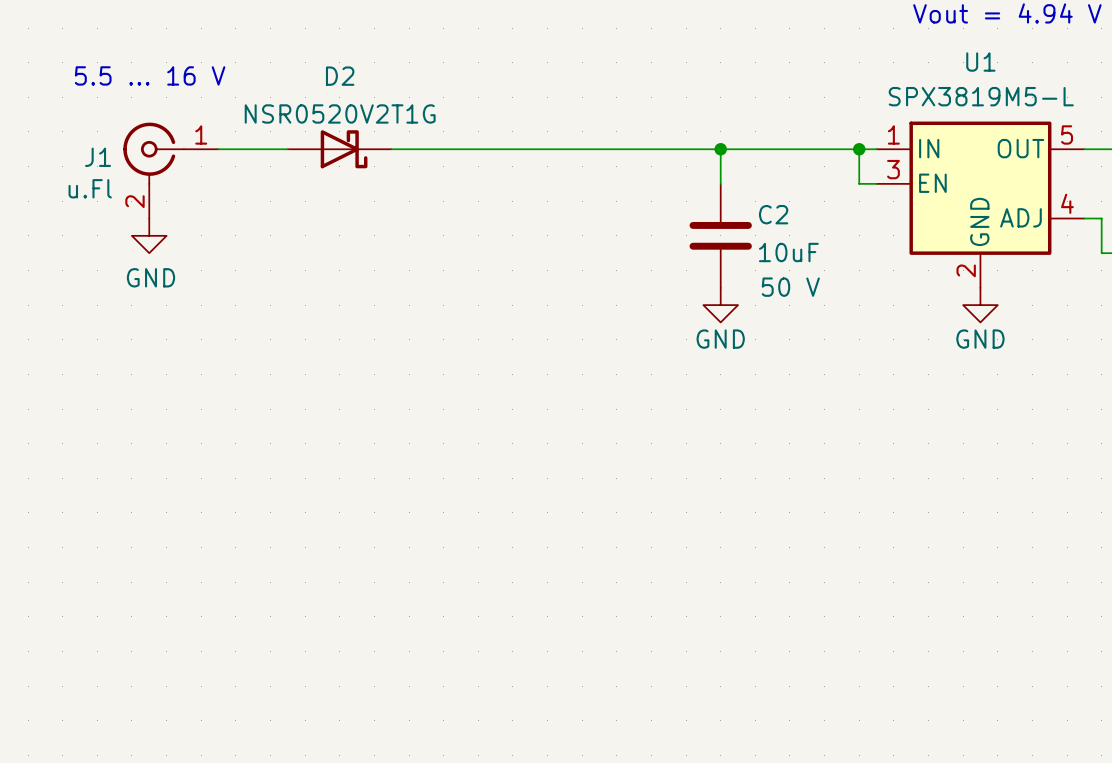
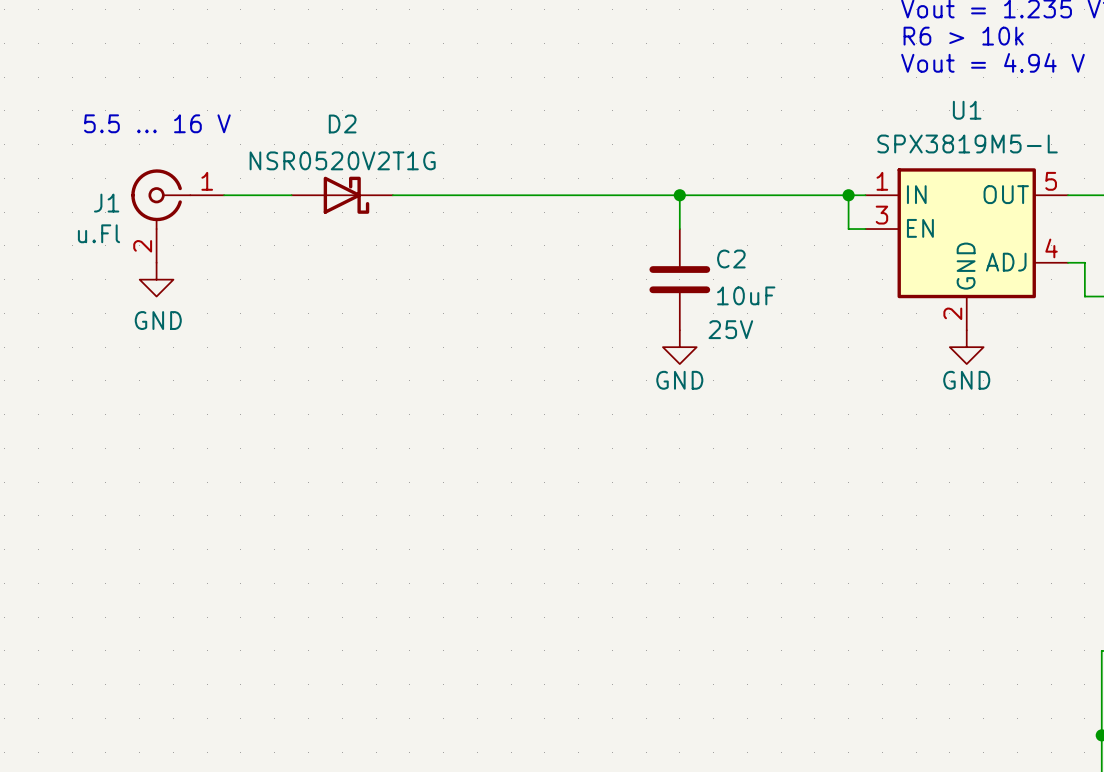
wire: (720, 149) (720, 183) -> (679, 195) (679, 229)
junction position: (720, 149) -> (679, 195)
C2 position: (720, 235) -> (679, 279)
C2 text: 50 V (790, 287) -> 25V (730, 329)
power symbol position: GND (720, 305) -> GND (679, 347)

